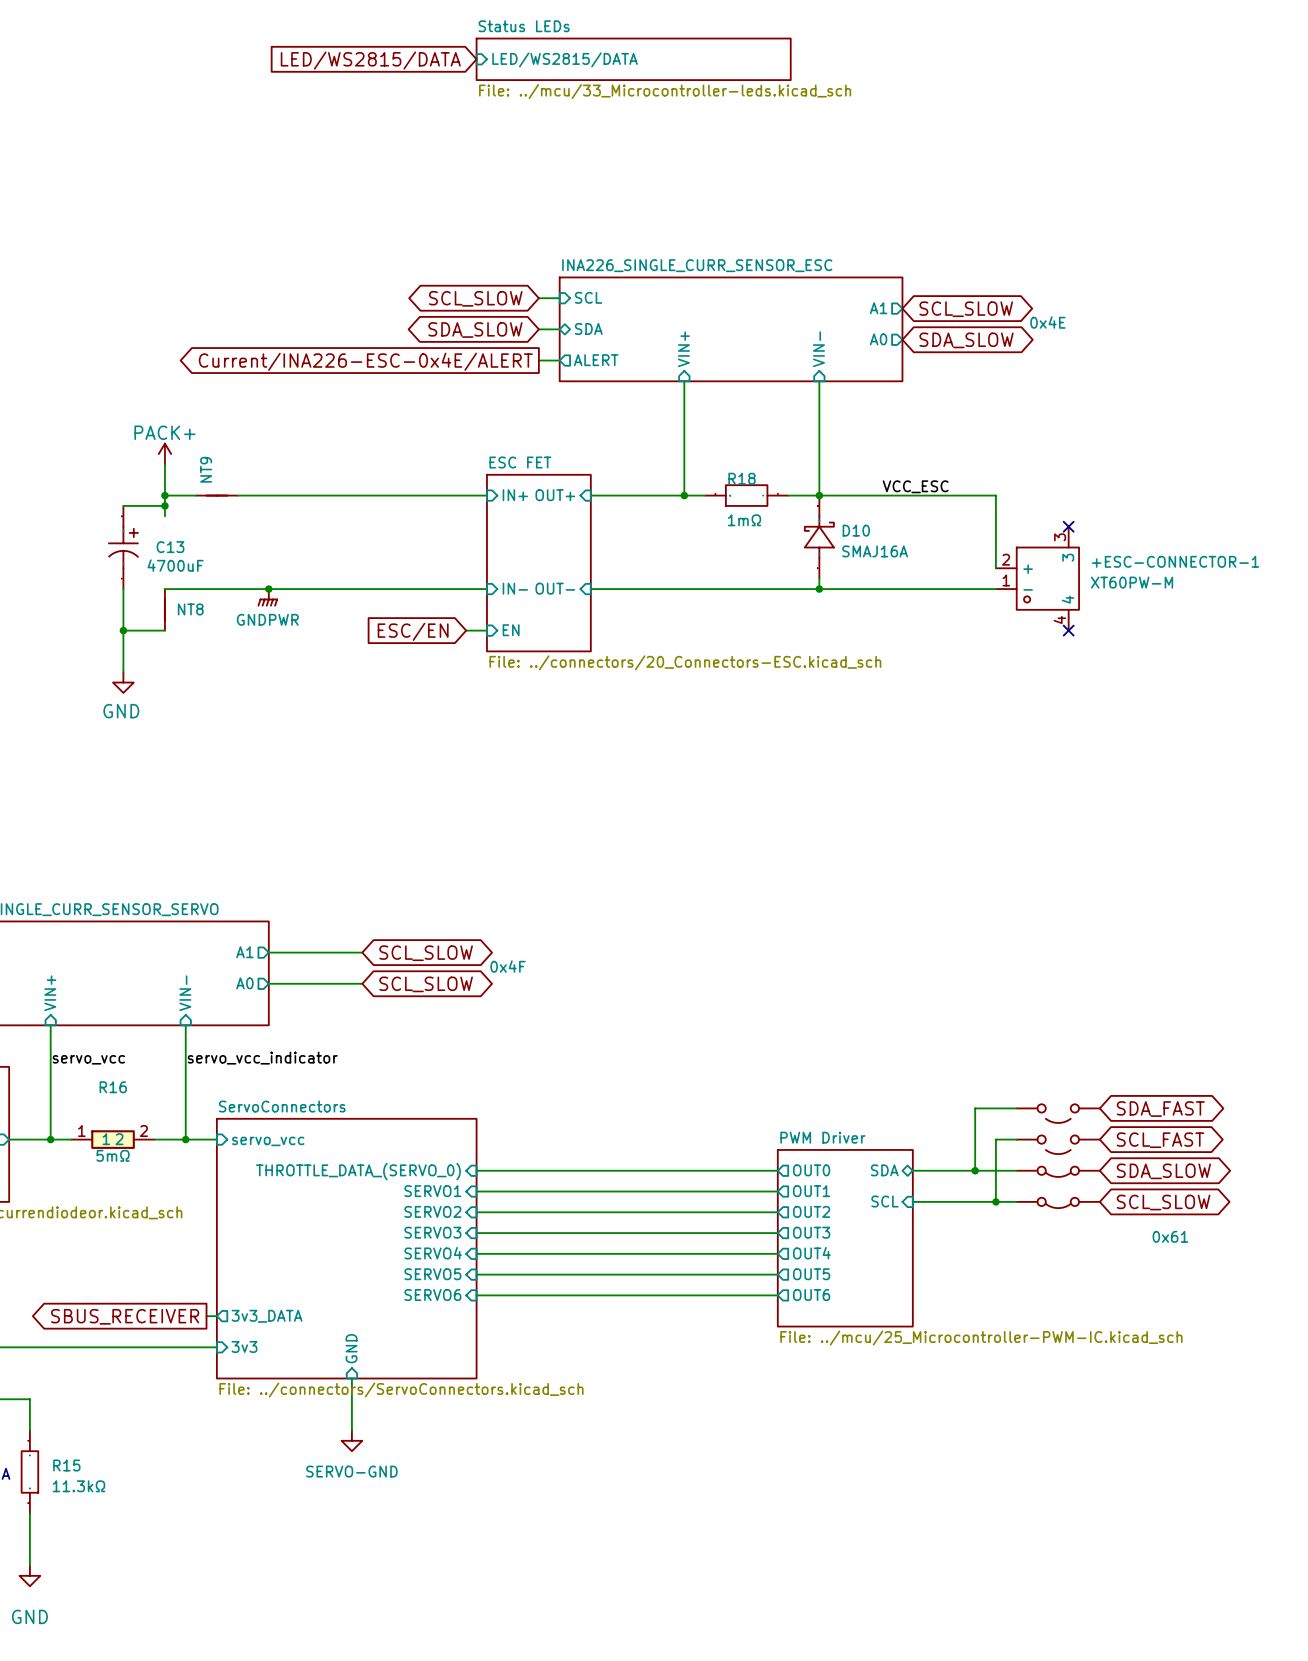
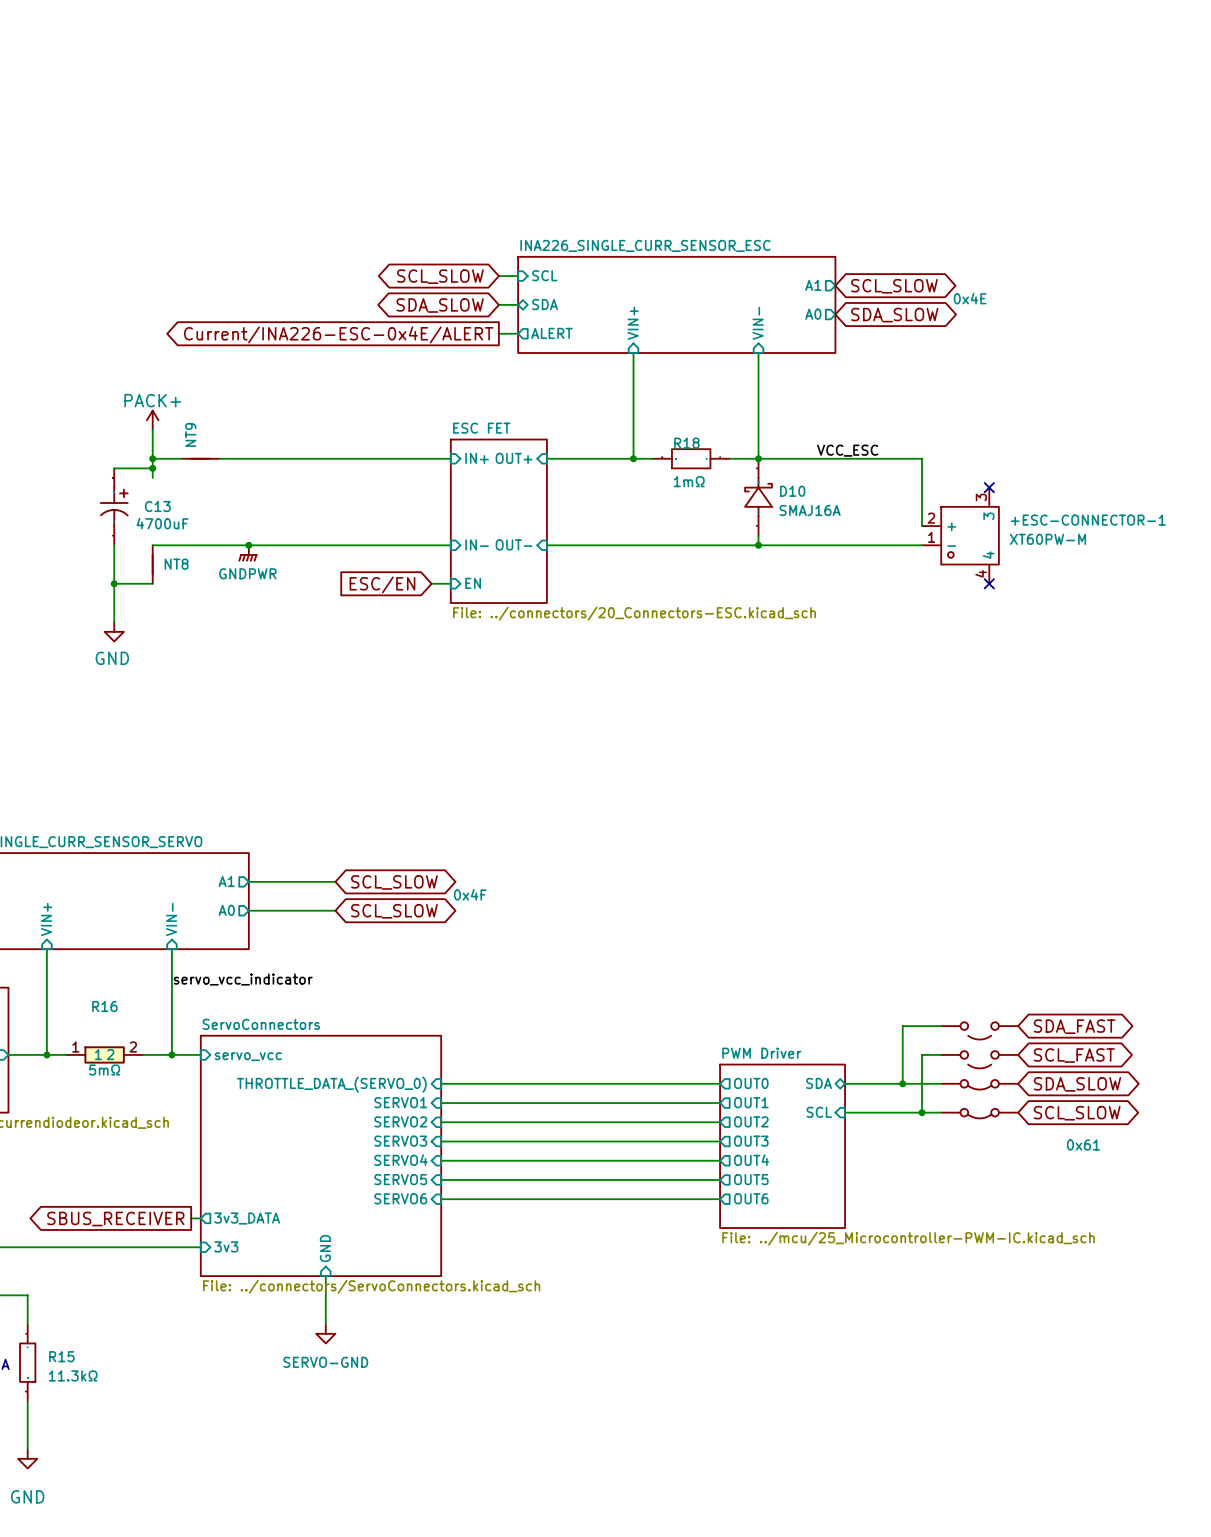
sheet pin: LED/WS2815/DATA (565, 59) -> none
sheet Status LEDs: File: ../mcu/33_Microcontroller-leds.kicad_sch (633, 59) -> none
global label: LED/WS2815/DATA (370, 60) -> none
label: servo_vcc (88, 1059) -> none

